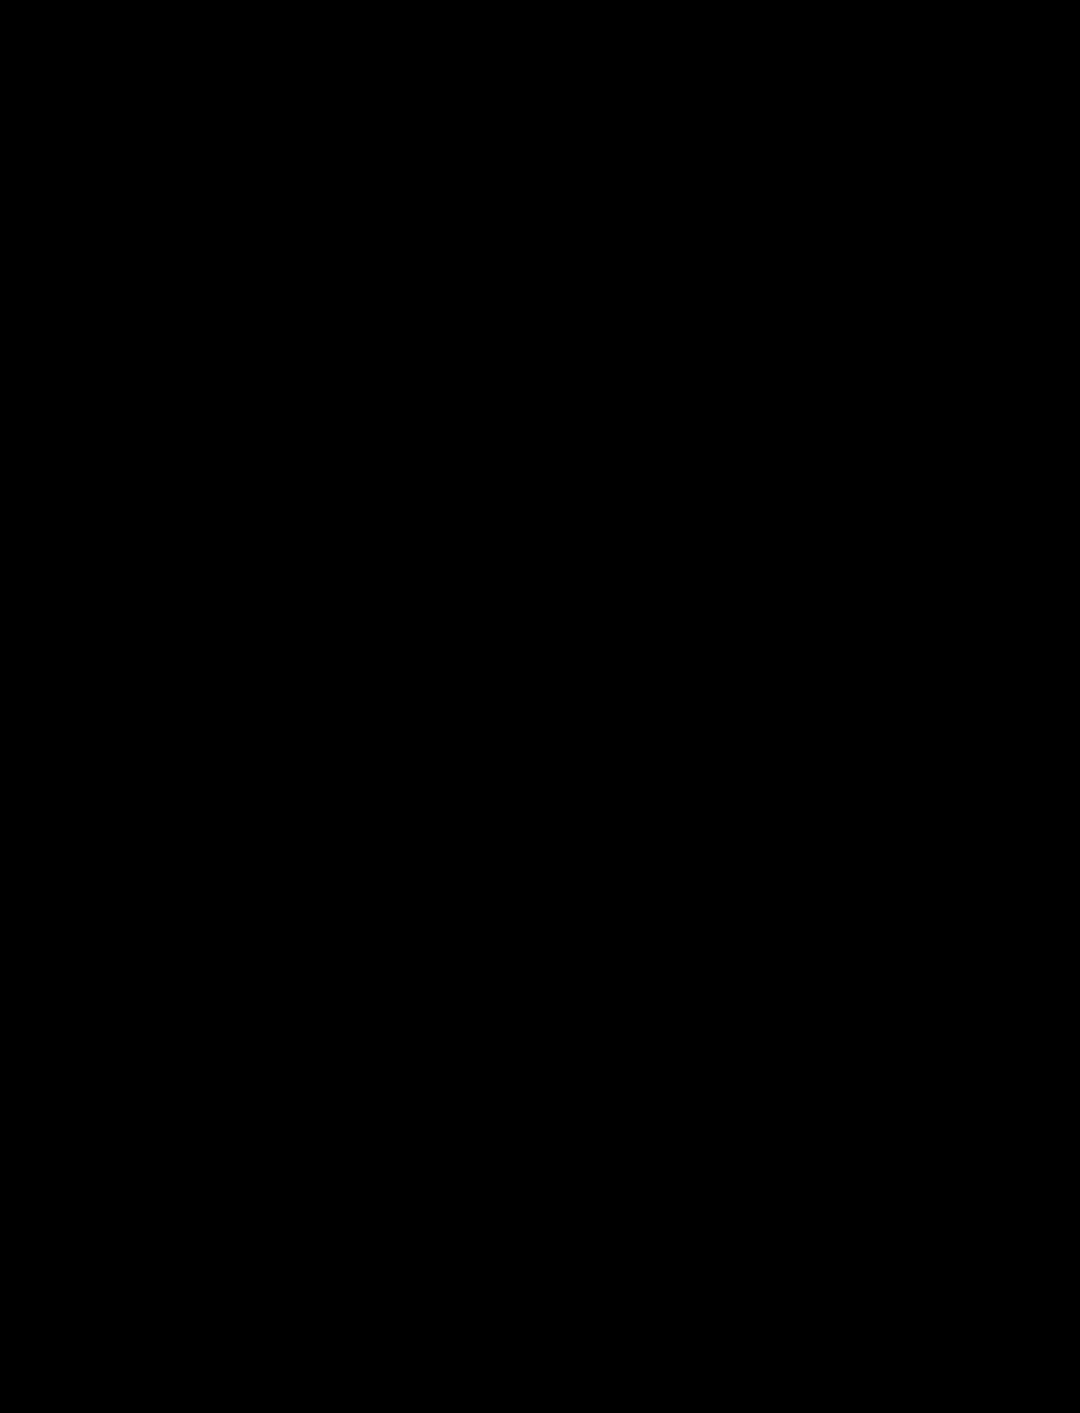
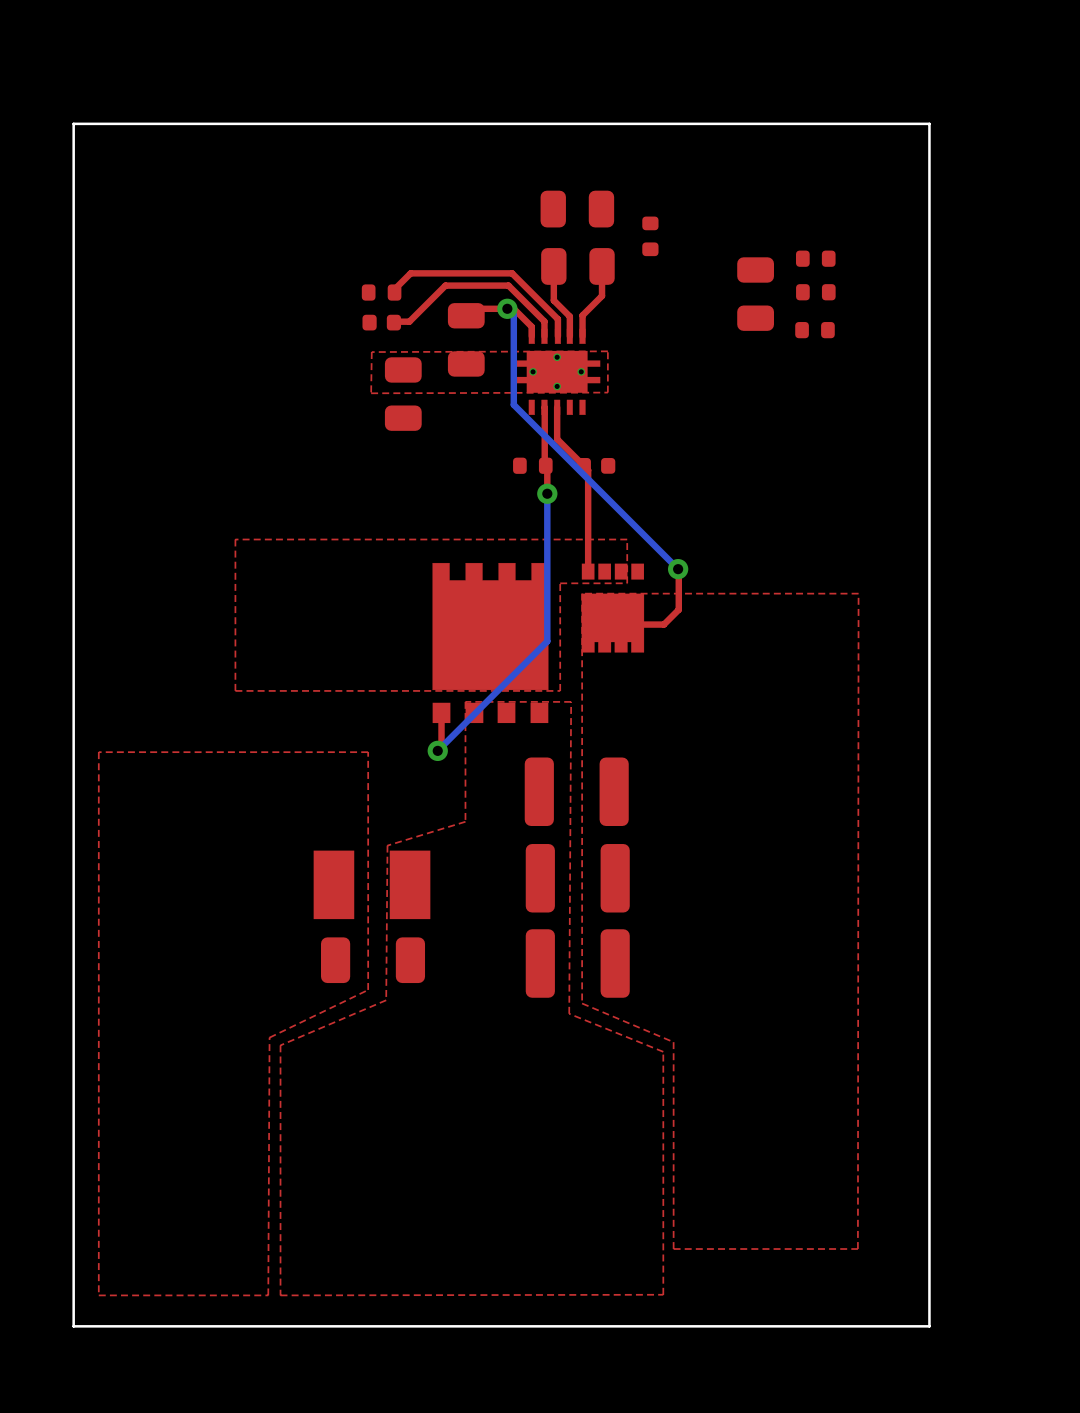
board edge: none -> (929, 123) (73, 123) (73, 1326) (929, 1326) (929, 123)
part: none -> (577, 209)
part: none -> (650, 236)
part: none -> (815, 258)
top track: none -> (553, 266) (553, 300) (569, 316) (569, 336)
part: none -> (577, 266)
top track: none -> (602, 266) (602, 295) (582, 315) (582, 336)
part: none -> (381, 292)
top track: none -> (394, 292) (394, 289) (410, 273) (512, 273) (557, 319) (557, 336)
part: none -> (815, 292)
part: none -> (755, 294)
bottom track: none -> (507, 308) (513, 315) (513, 404) (678, 569)
via: none -> (507, 308)
top track: none -> (466, 315) (473, 308) (513, 308) (531, 326) (531, 336)
part: none -> (381, 322)
top track: none -> (393, 322) (409, 321) (445, 285) (508, 285) (544, 321) (544, 336)
part: none -> (815, 330)
part: none -> (466, 339)
top zone outline: none -> (607, 351) (607, 392) (371, 393) (371, 352) (607, 351)
part: none -> (557, 371)
part: none -> (403, 394)
top track: none -> (544, 407) (544, 464) (547, 467) (547, 493)
top track: none -> (557, 407) (557, 439) (588, 470) (588, 571)
part: none -> (532, 465)
part: none -> (596, 465)
bottom track: none -> (547, 493) (547, 641) (437, 750)
via: none -> (547, 493)
top zone outline: none -> (627, 539) (627, 583) (560, 583) (560, 690) (235, 690) (235, 539) (627, 539)
top track: none -> (678, 569) (678, 609) (663, 624) (612, 624)
via: none -> (678, 569)
top zone outline: none -> (858, 593) (857, 1249) (673, 1249) (673, 1042) (582, 1003) (582, 593) (858, 593)
part: none -> (612, 608)
part: none -> (490, 643)
top zone outline: none -> (571, 701) (569, 1013) (663, 1051) (663, 1294) (280, 1295) (280, 1045) (386, 1000) (387, 845) (465, 821) (465, 701) (571, 701)
top track: none -> (441, 712) (441, 747) (437, 750)
via: none -> (437, 750)
top zone outline: none -> (368, 752) (368, 989) (269, 1037) (268, 1295) (98, 1295) (98, 752) (368, 752)
part: none -> (576, 791)
part: none -> (577, 878)
part: none -> (372, 884)
part: none -> (373, 960)
part: none -> (577, 963)

